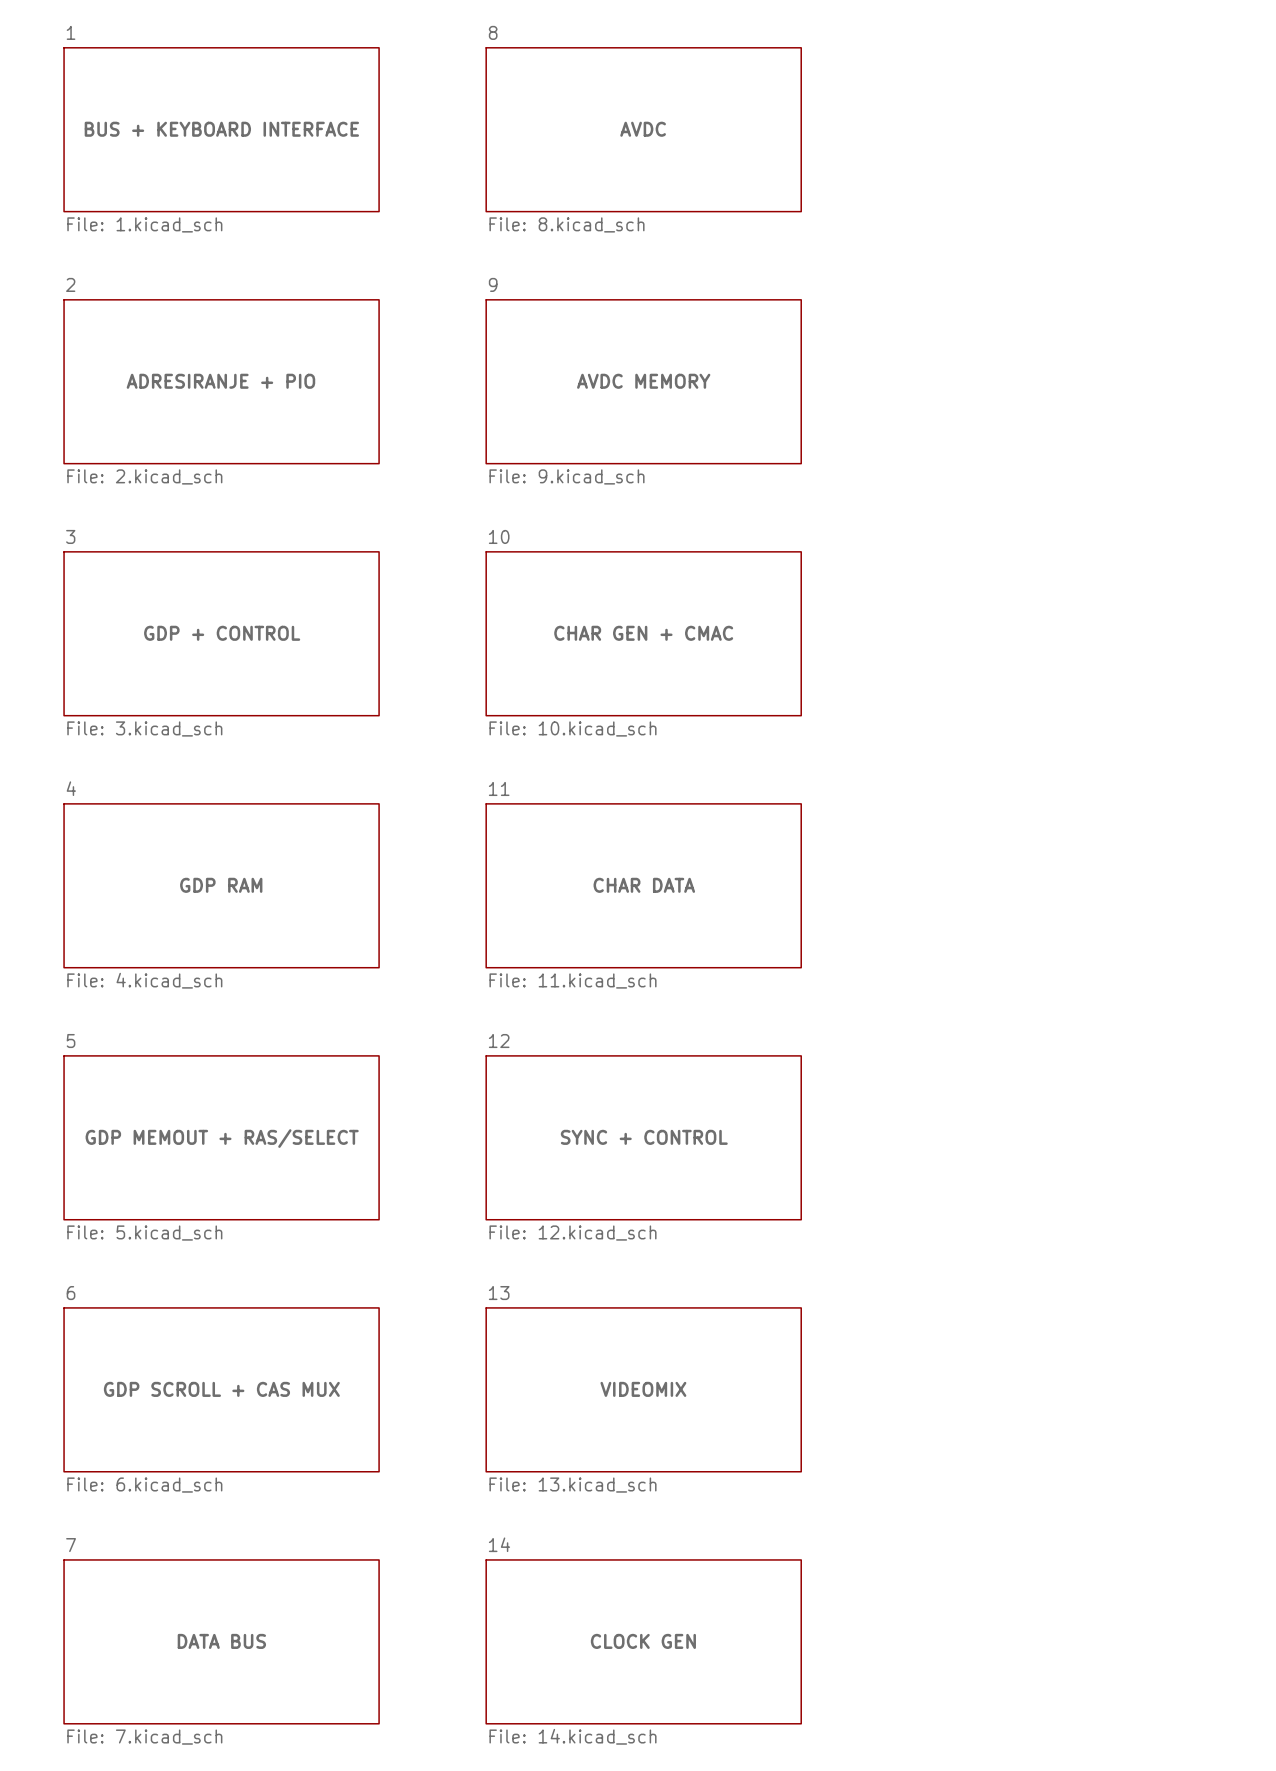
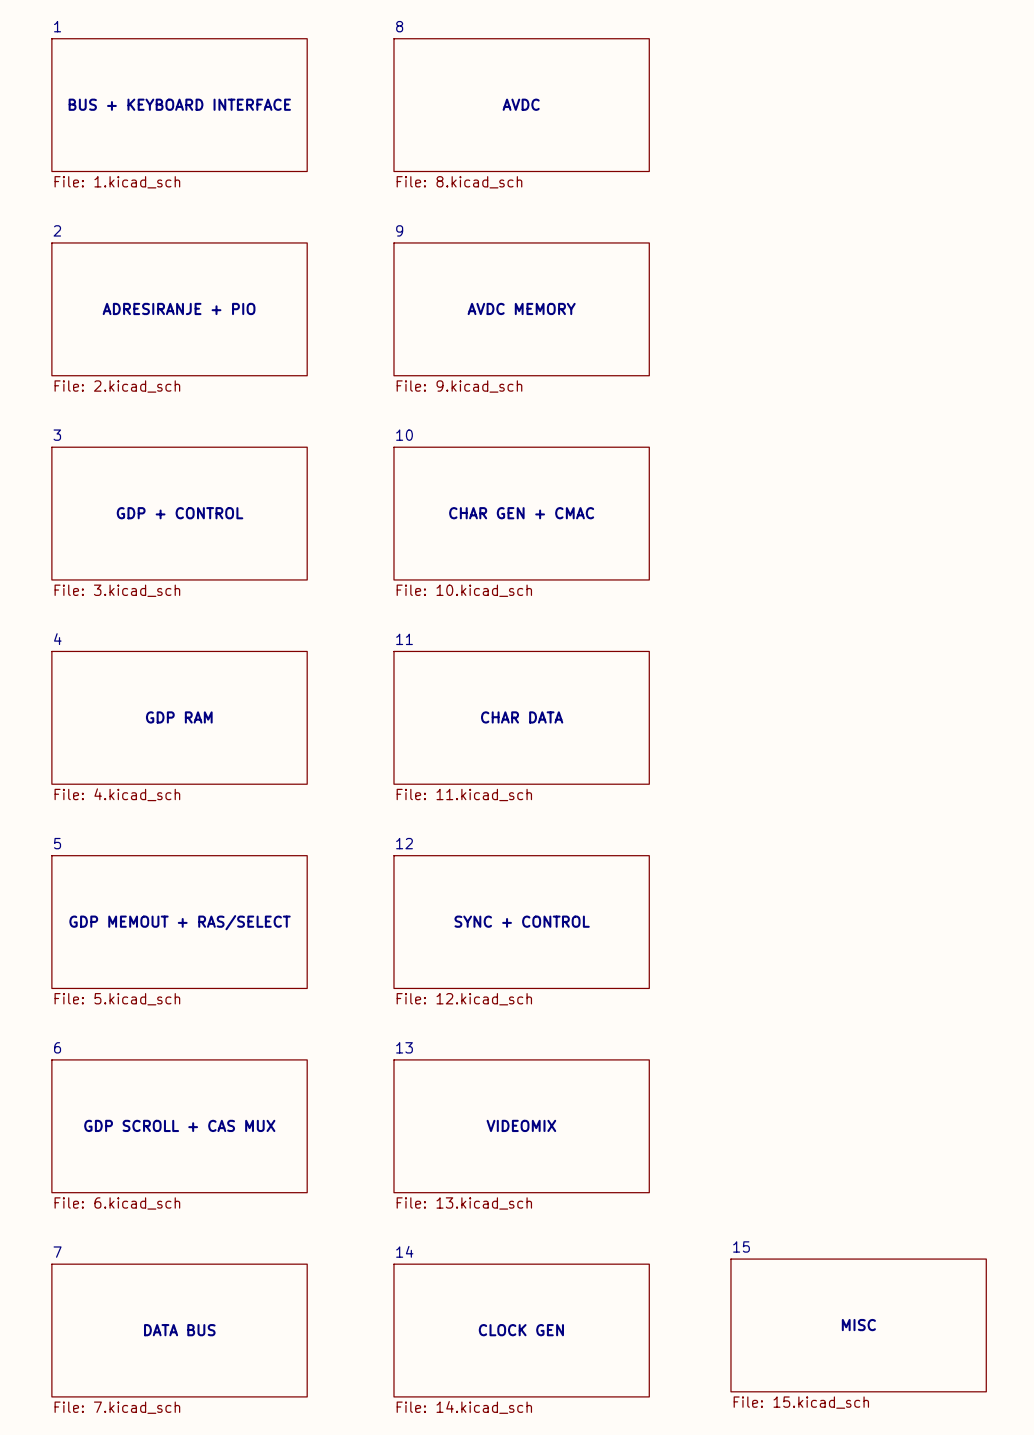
sheet 15: none -> File: 15.kicad_sch (858, 1325)

